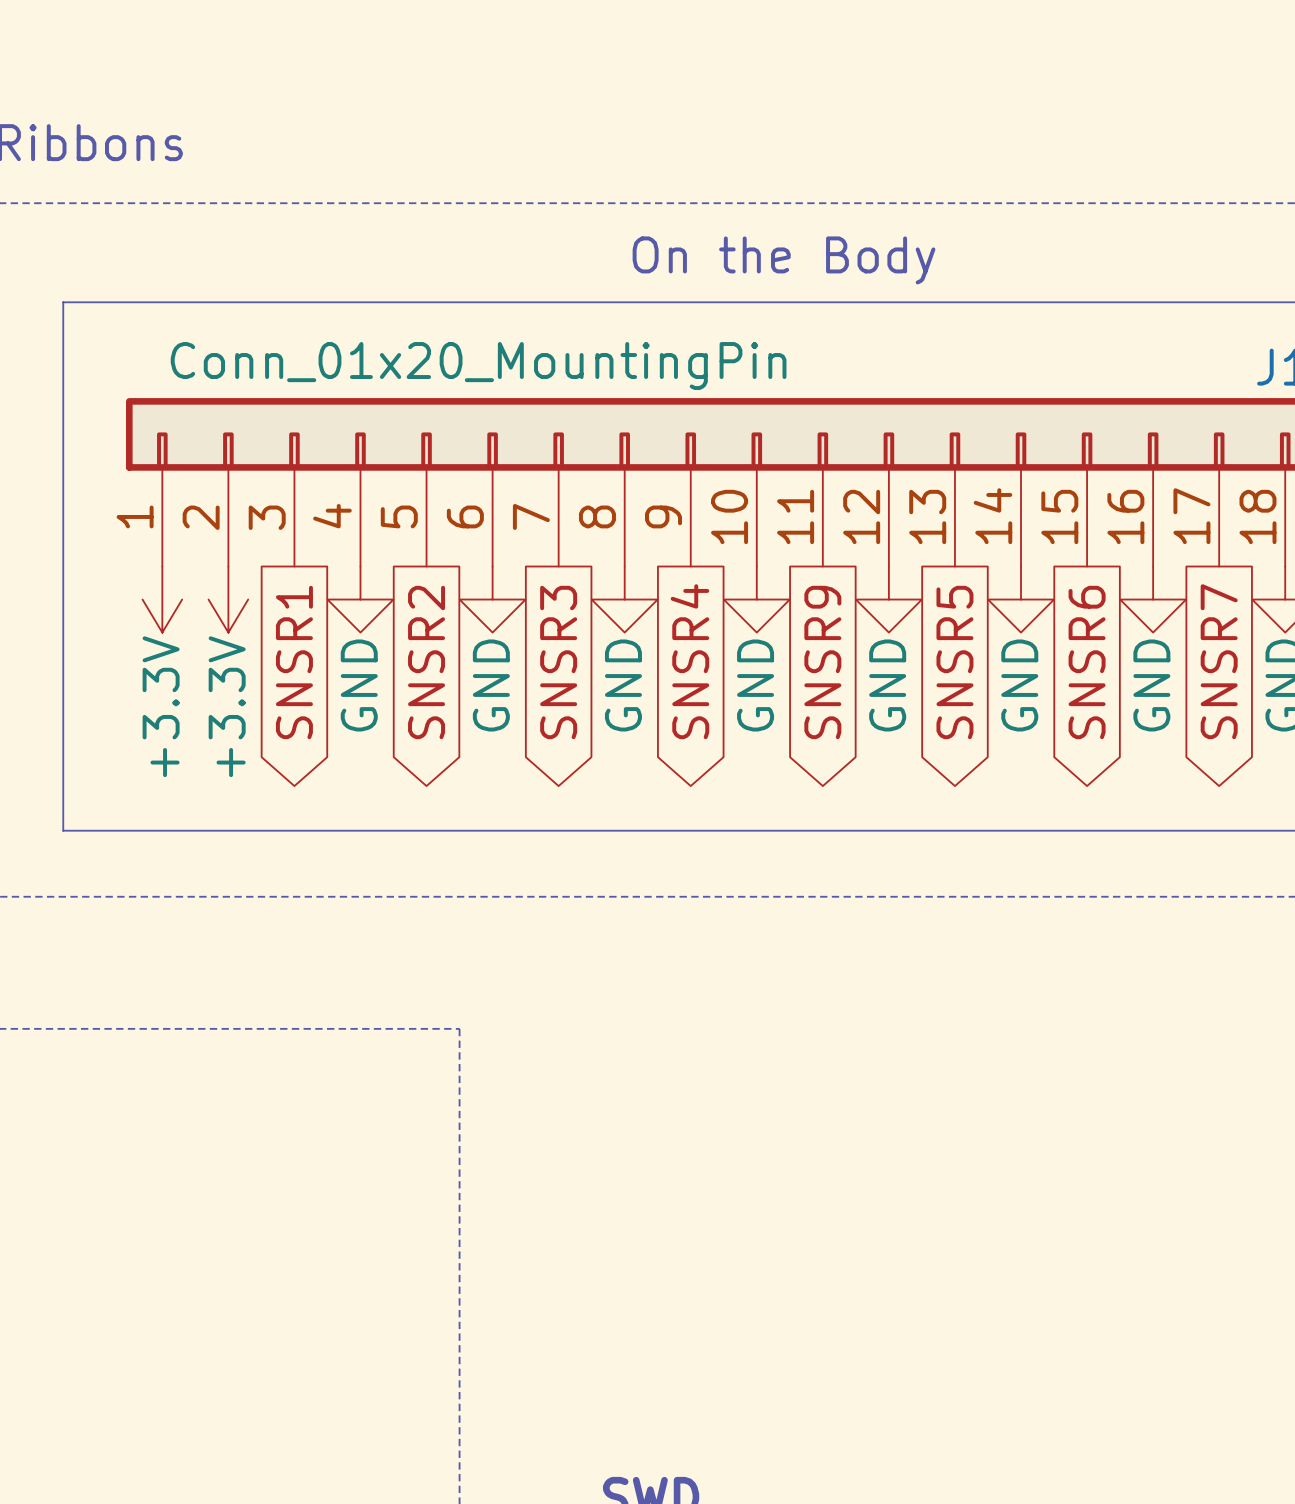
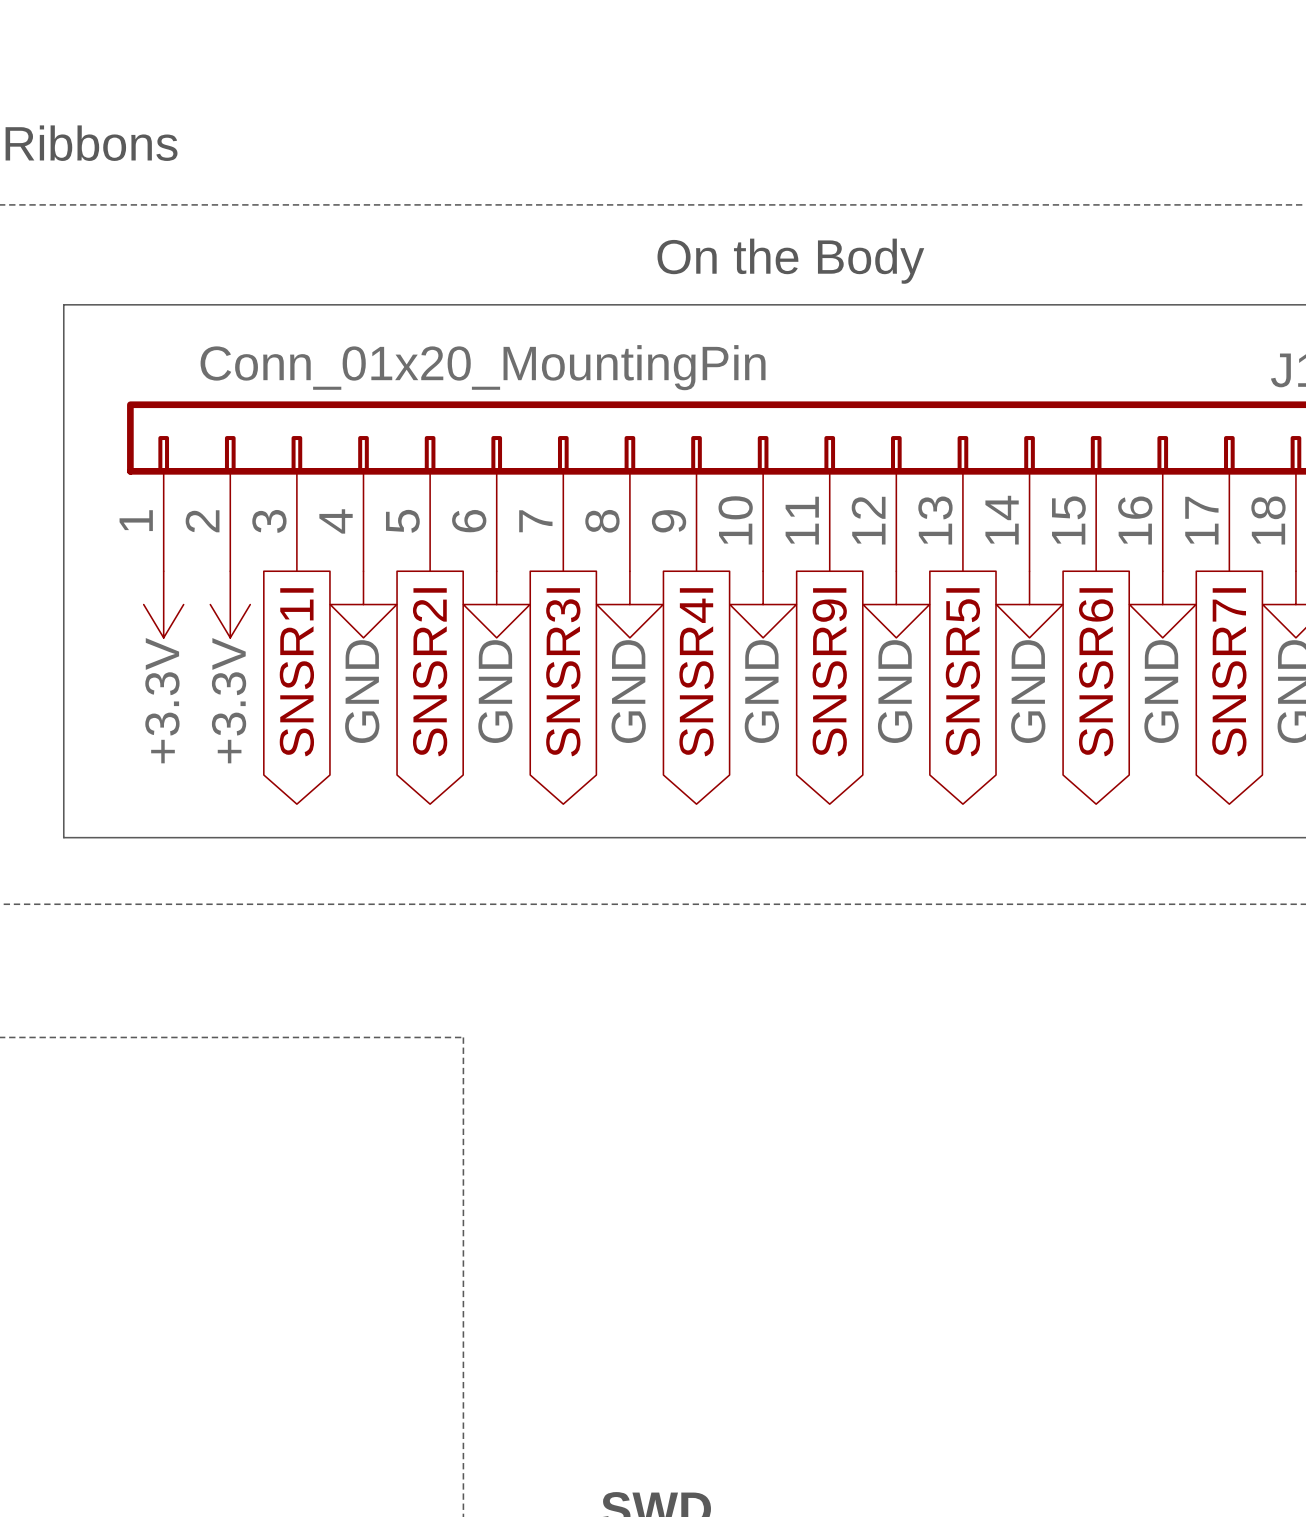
global label: SNSR4 (689, 661) -> SNSR4I (696, 672)
global label: SNSR7 (1219, 661) -> SNSR7I (1229, 672)
global label: SNSR1 (294, 662) -> SNSR1I (296, 672)
global label: SNSR2 (426, 662) -> SNSR2I (430, 672)
global label: SNSR3 (558, 662) -> SNSR3I (563, 672)
global label: SNSR9 (822, 662) -> SNSR9I (829, 672)
global label: SNSR5 (954, 662) -> SNSR5I (962, 672)
global label: SNSR6 (1087, 662) -> SNSR6I (1096, 672)

